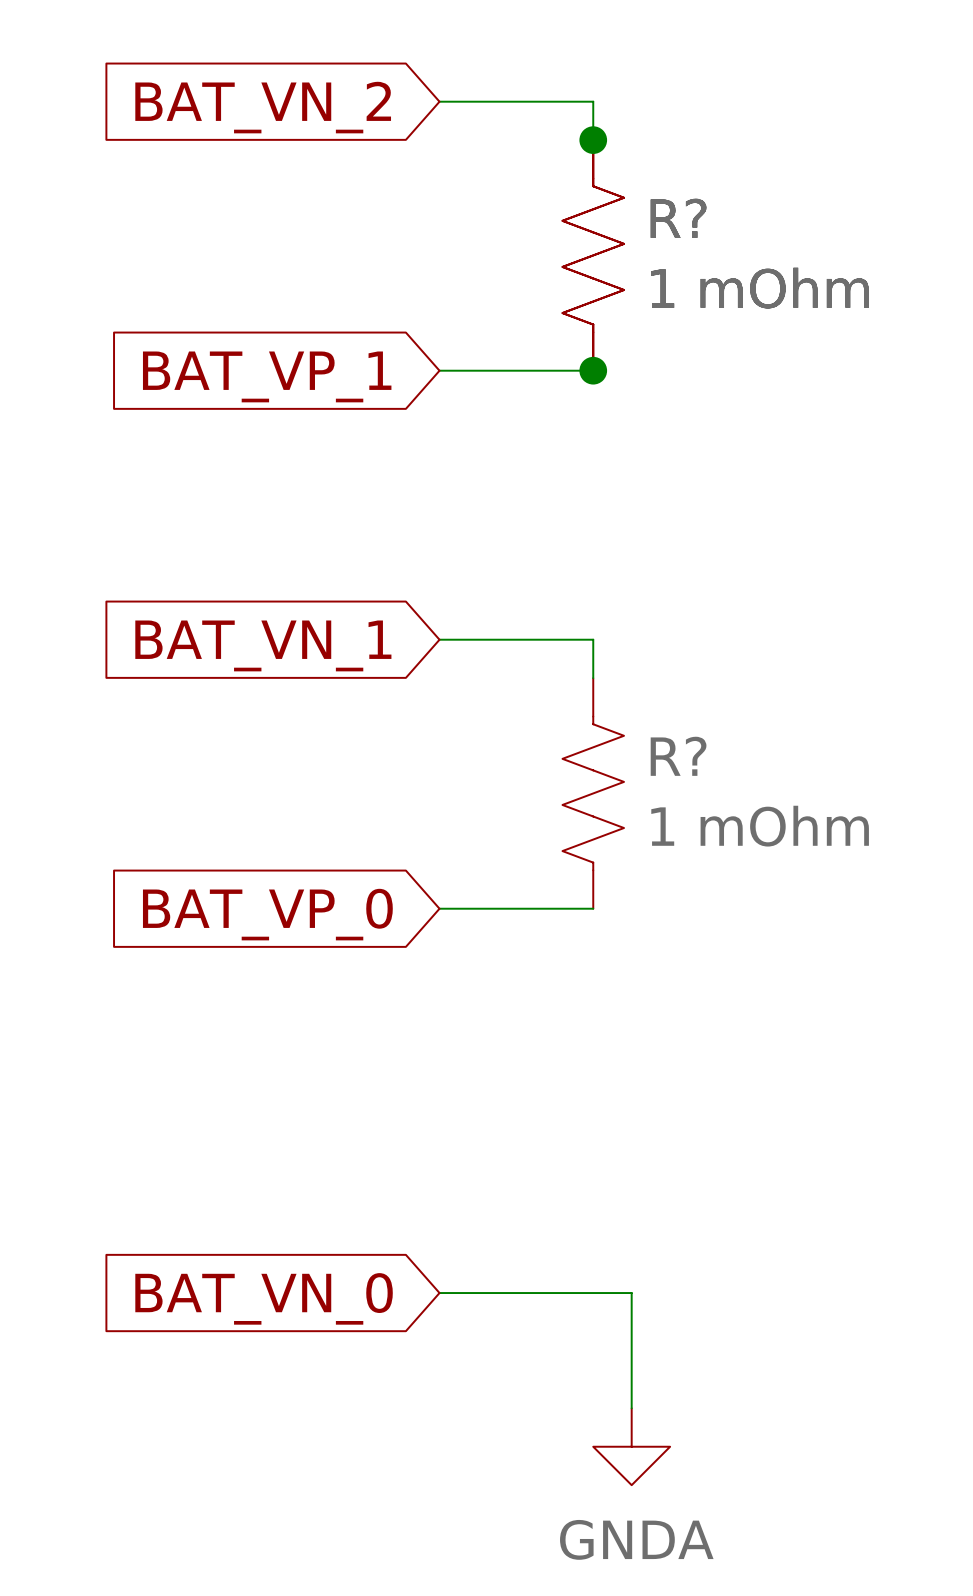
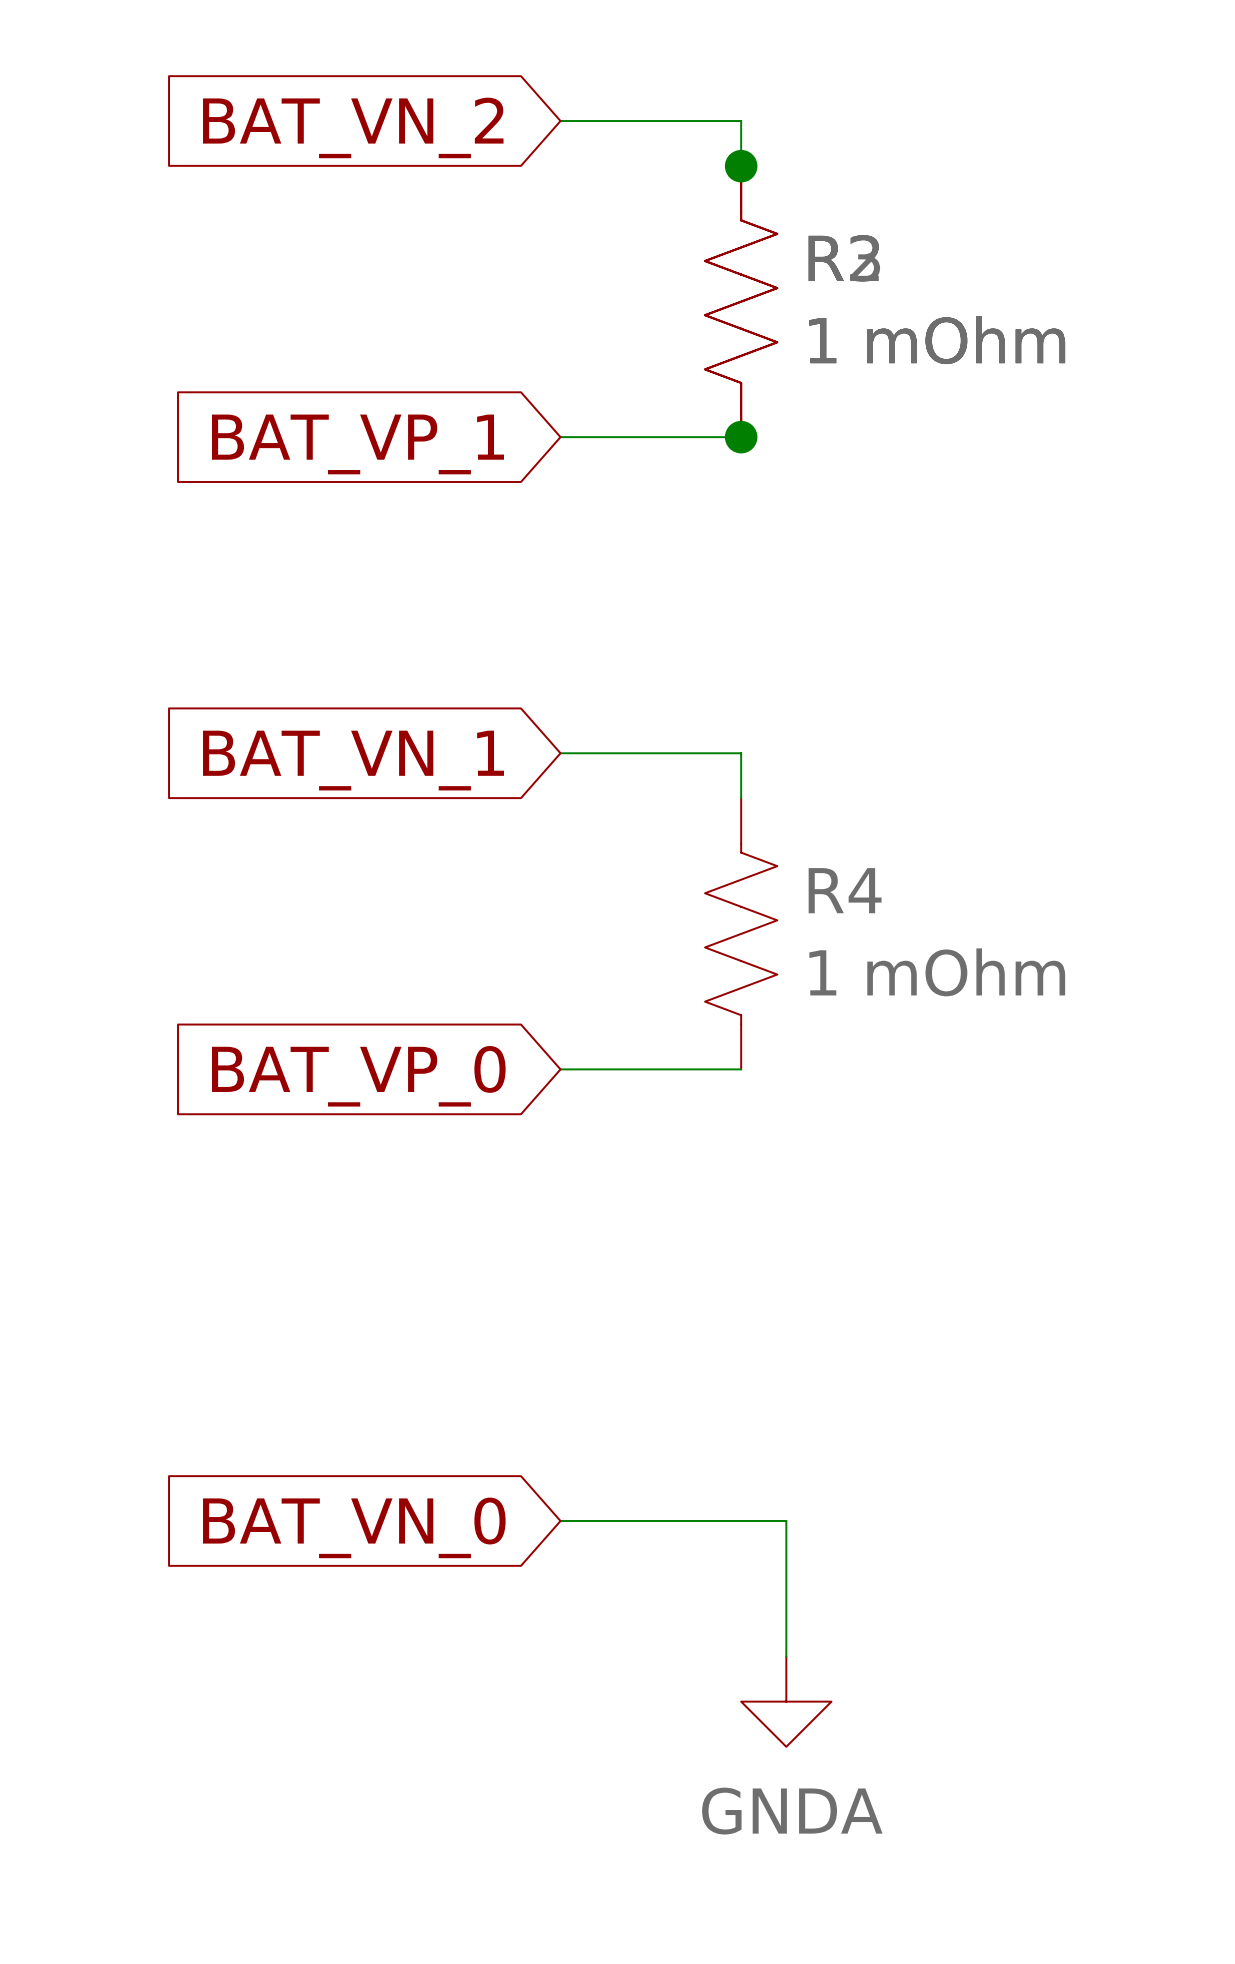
R?: 1 mOhm (593, 255) -> none
part: none -> 1 mOhm (741, 301)
part: none -> 1 mOhm (741, 301)
R? name: R? (678, 756) -> R4 (845, 890)

